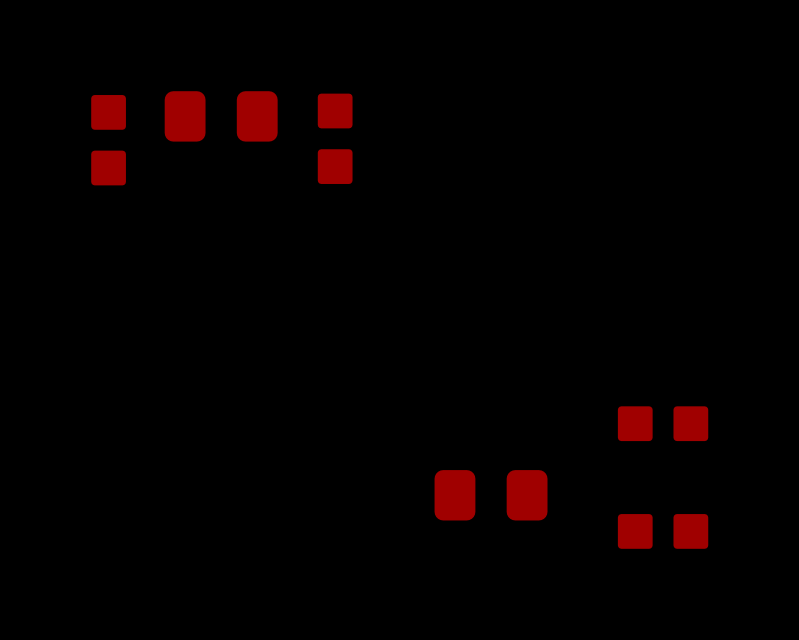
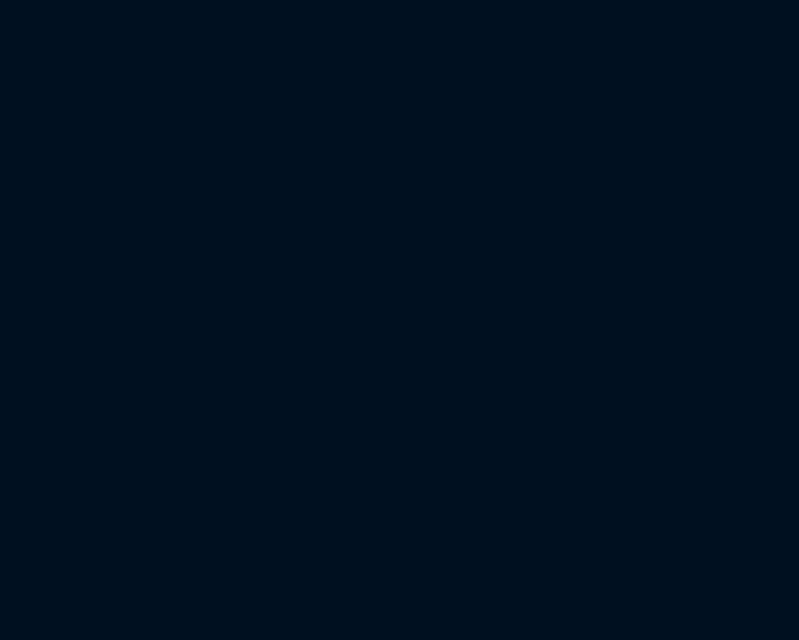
part: (221, 116) -> none
part: (335, 138) -> none
part: (108, 140) -> none
part: (663, 423) -> none
part: (491, 495) -> none
part: (663, 531) -> none

